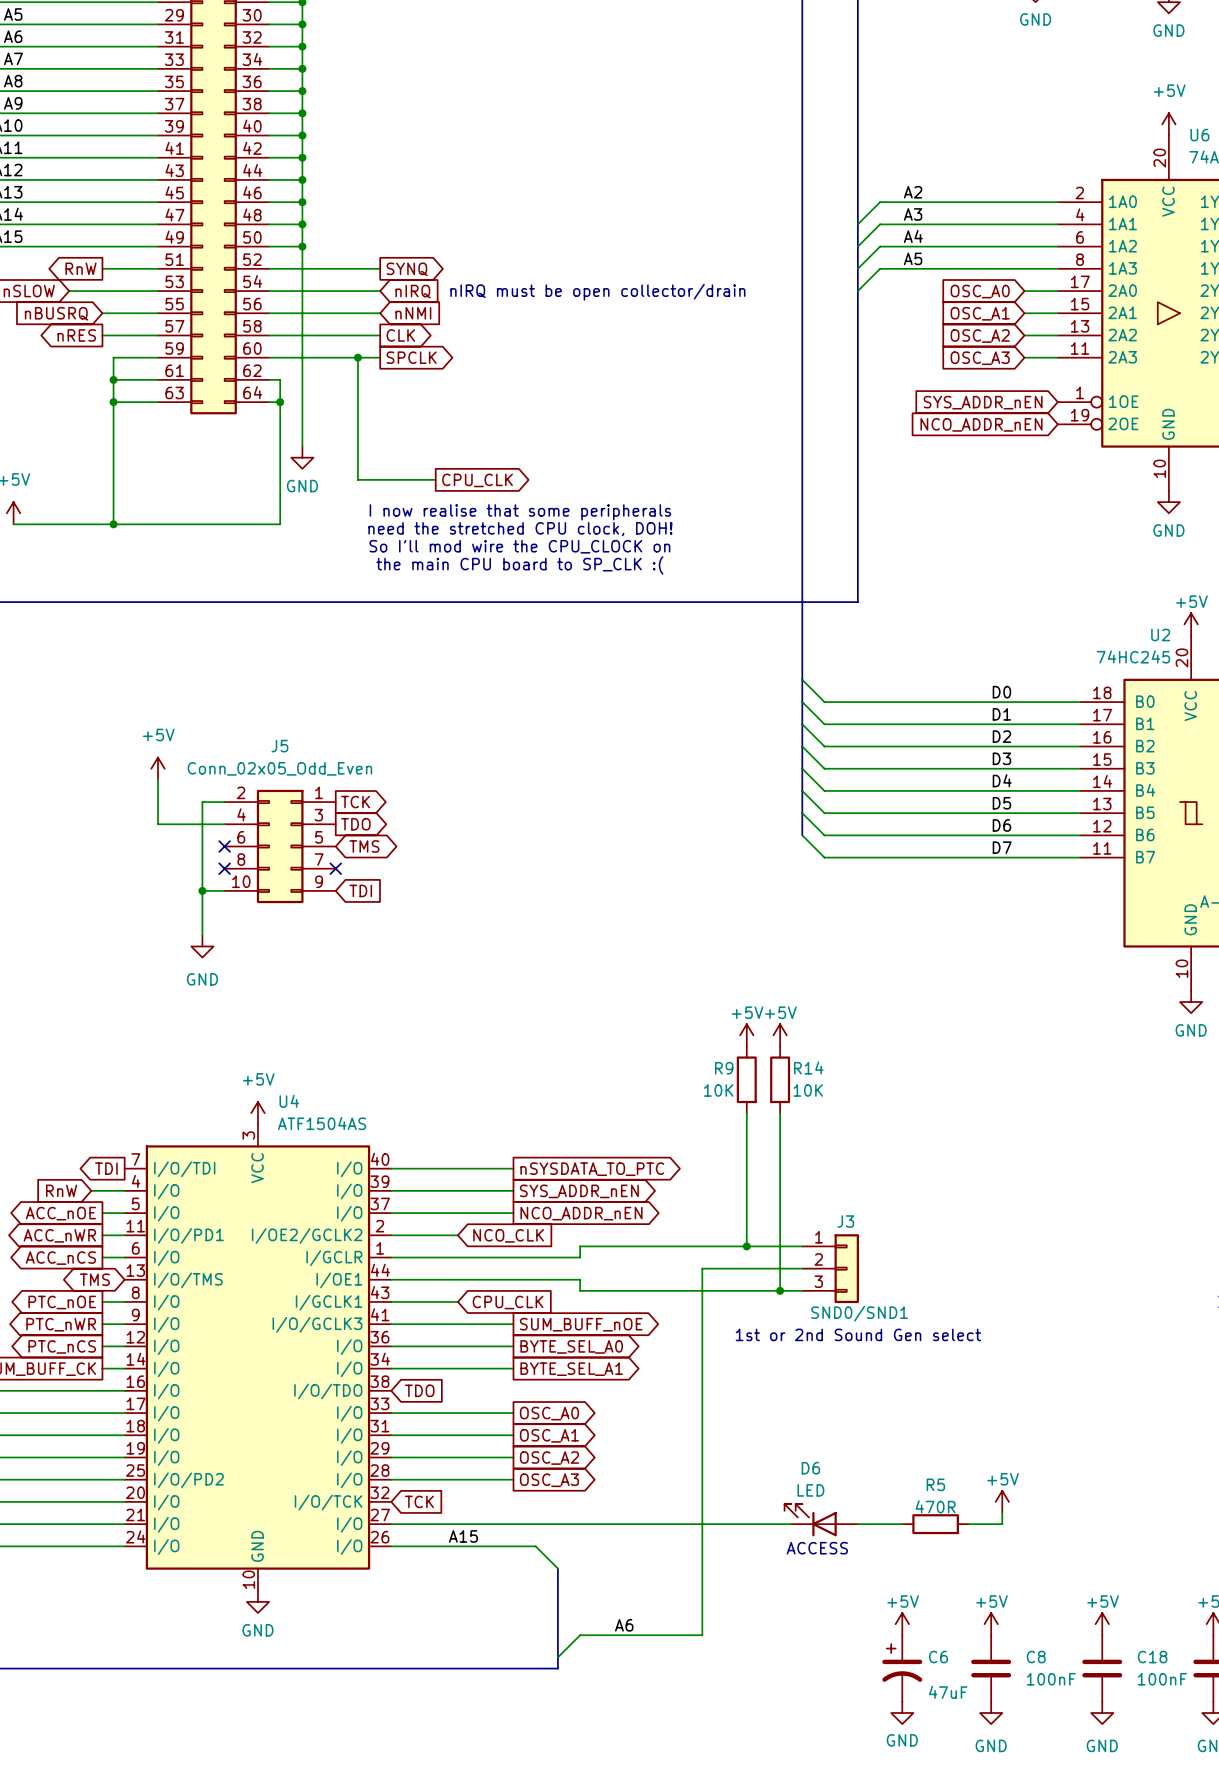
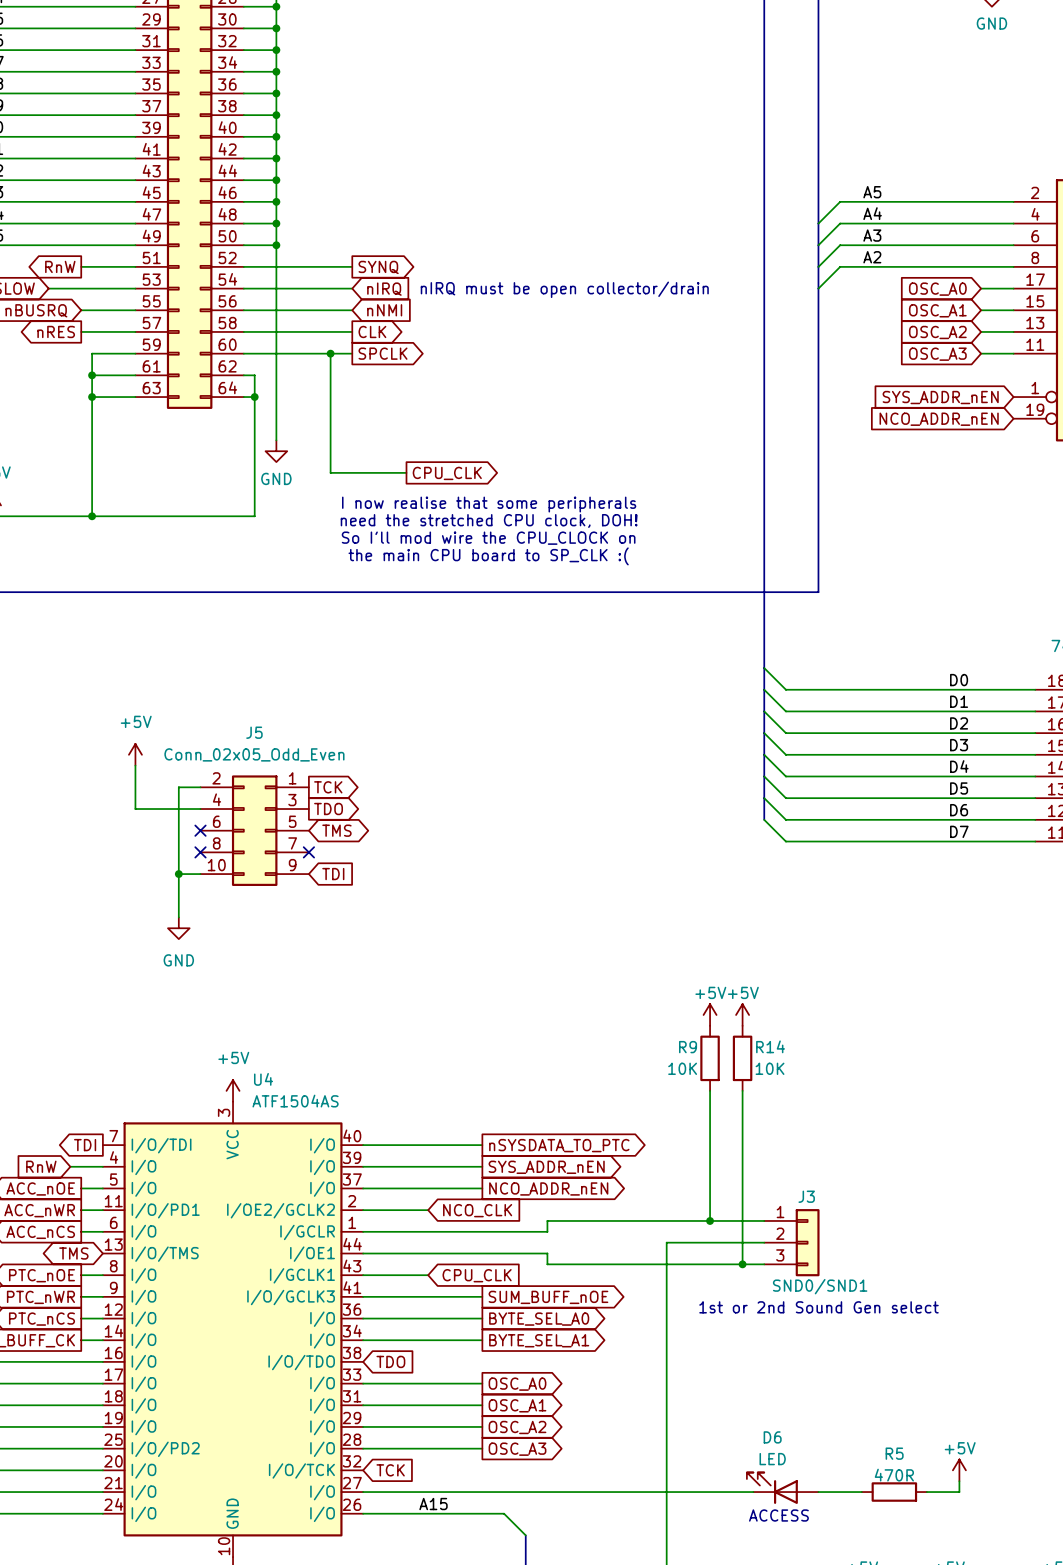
label: A2 (913, 192) -> A5 (872, 192)
label: A3 (913, 214) -> A4 (872, 213)
label: A4 (913, 236) -> A3 (872, 235)
label: A5 (913, 258) -> A2 (872, 257)

